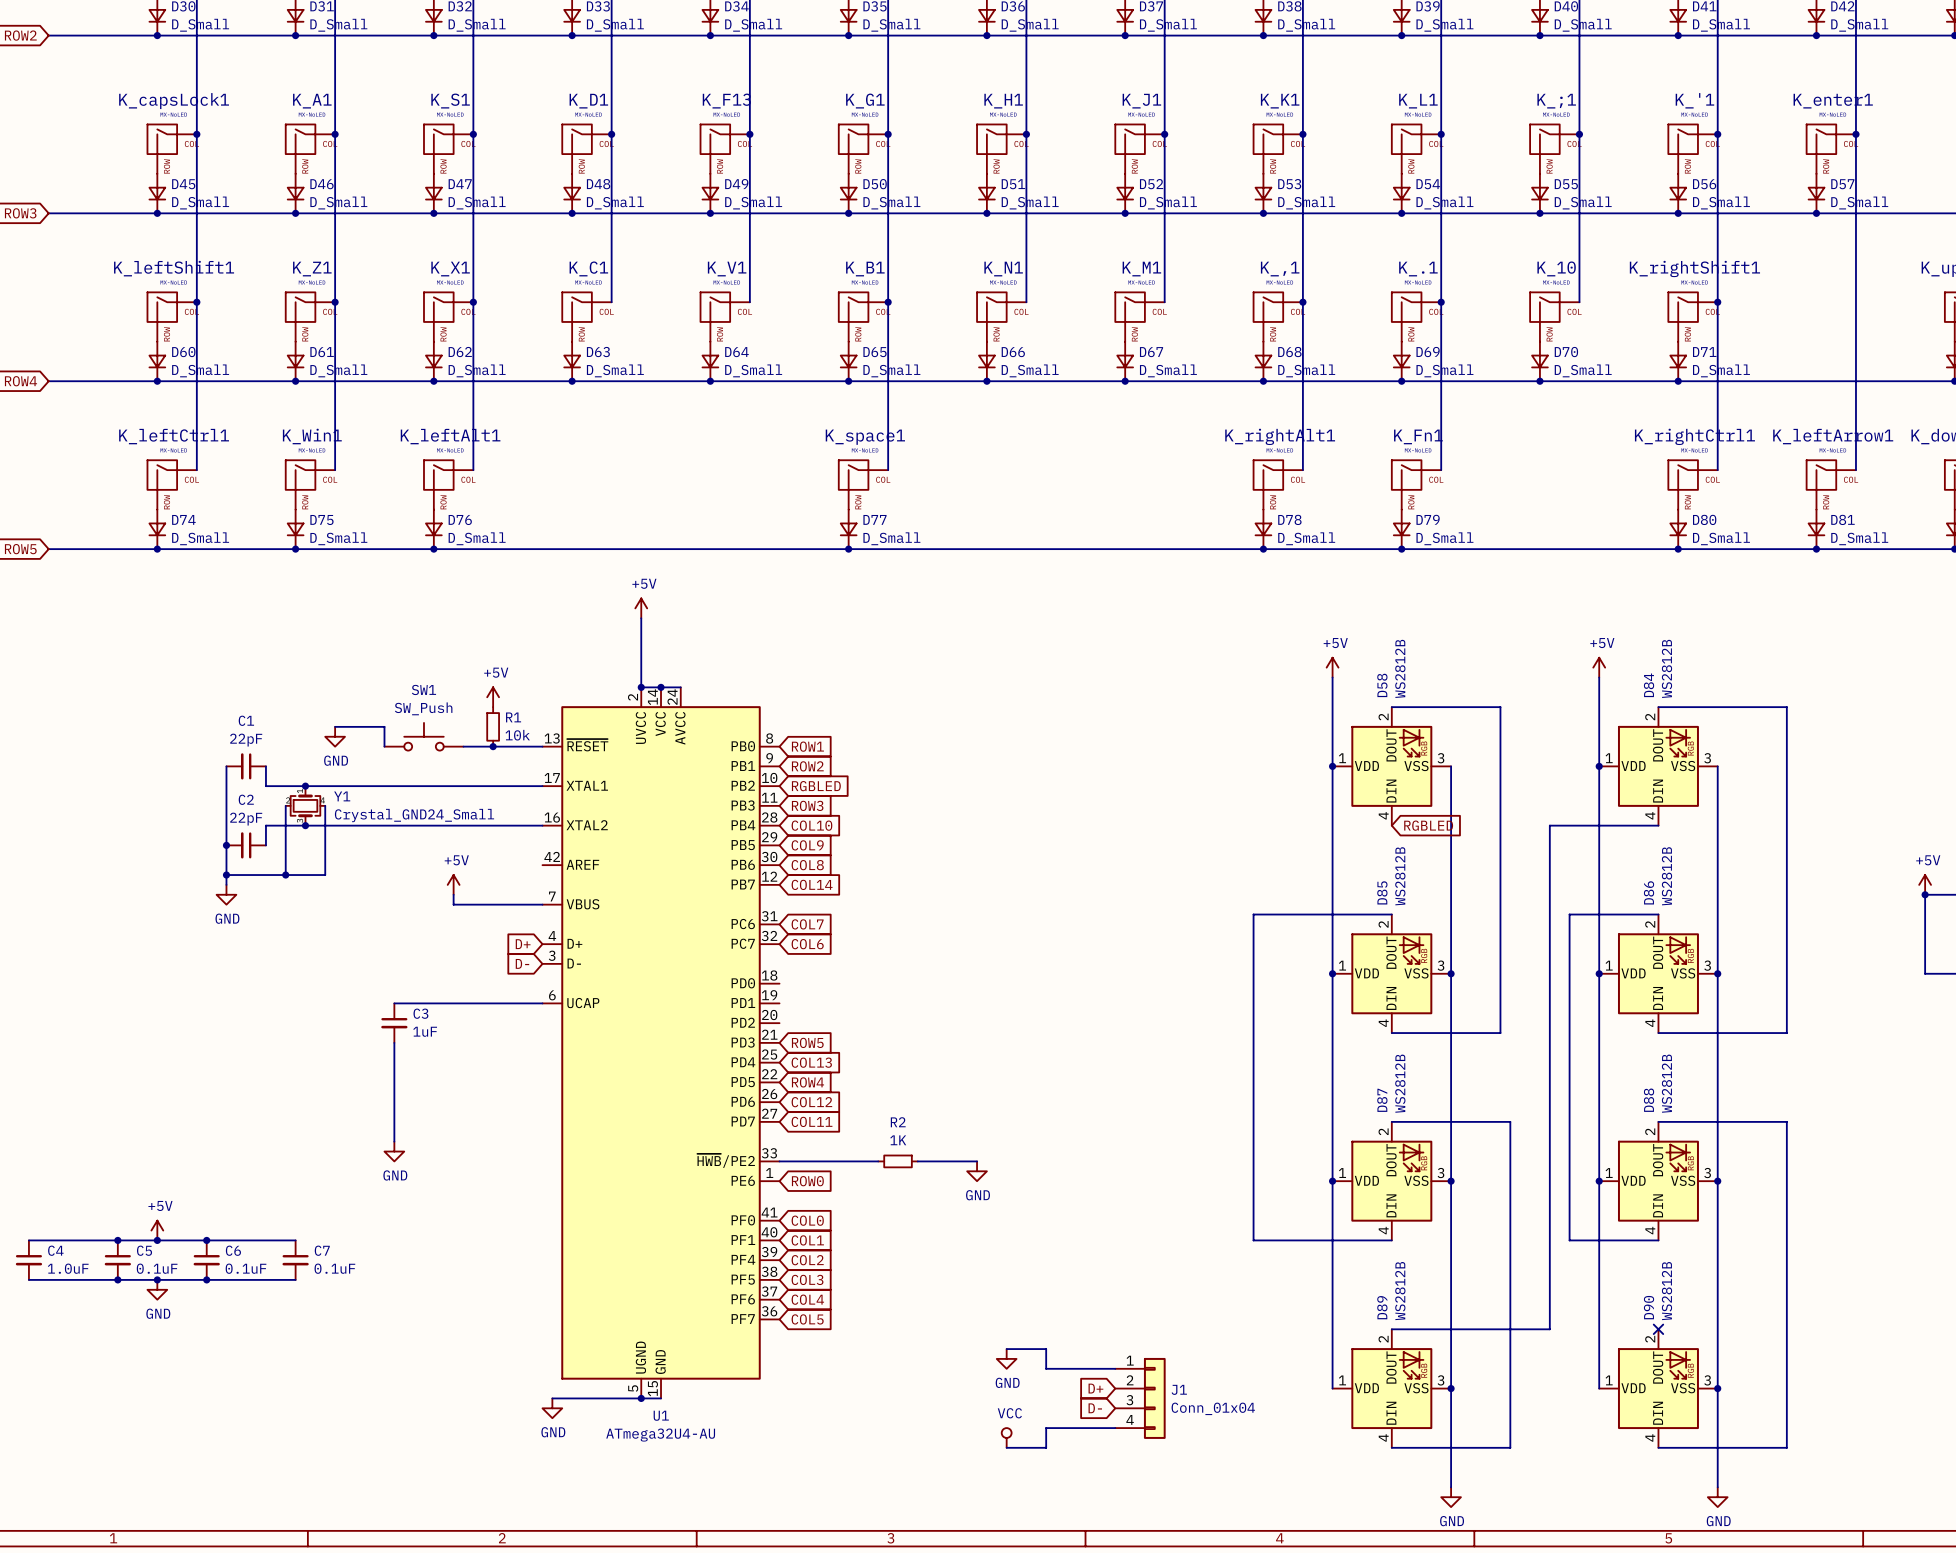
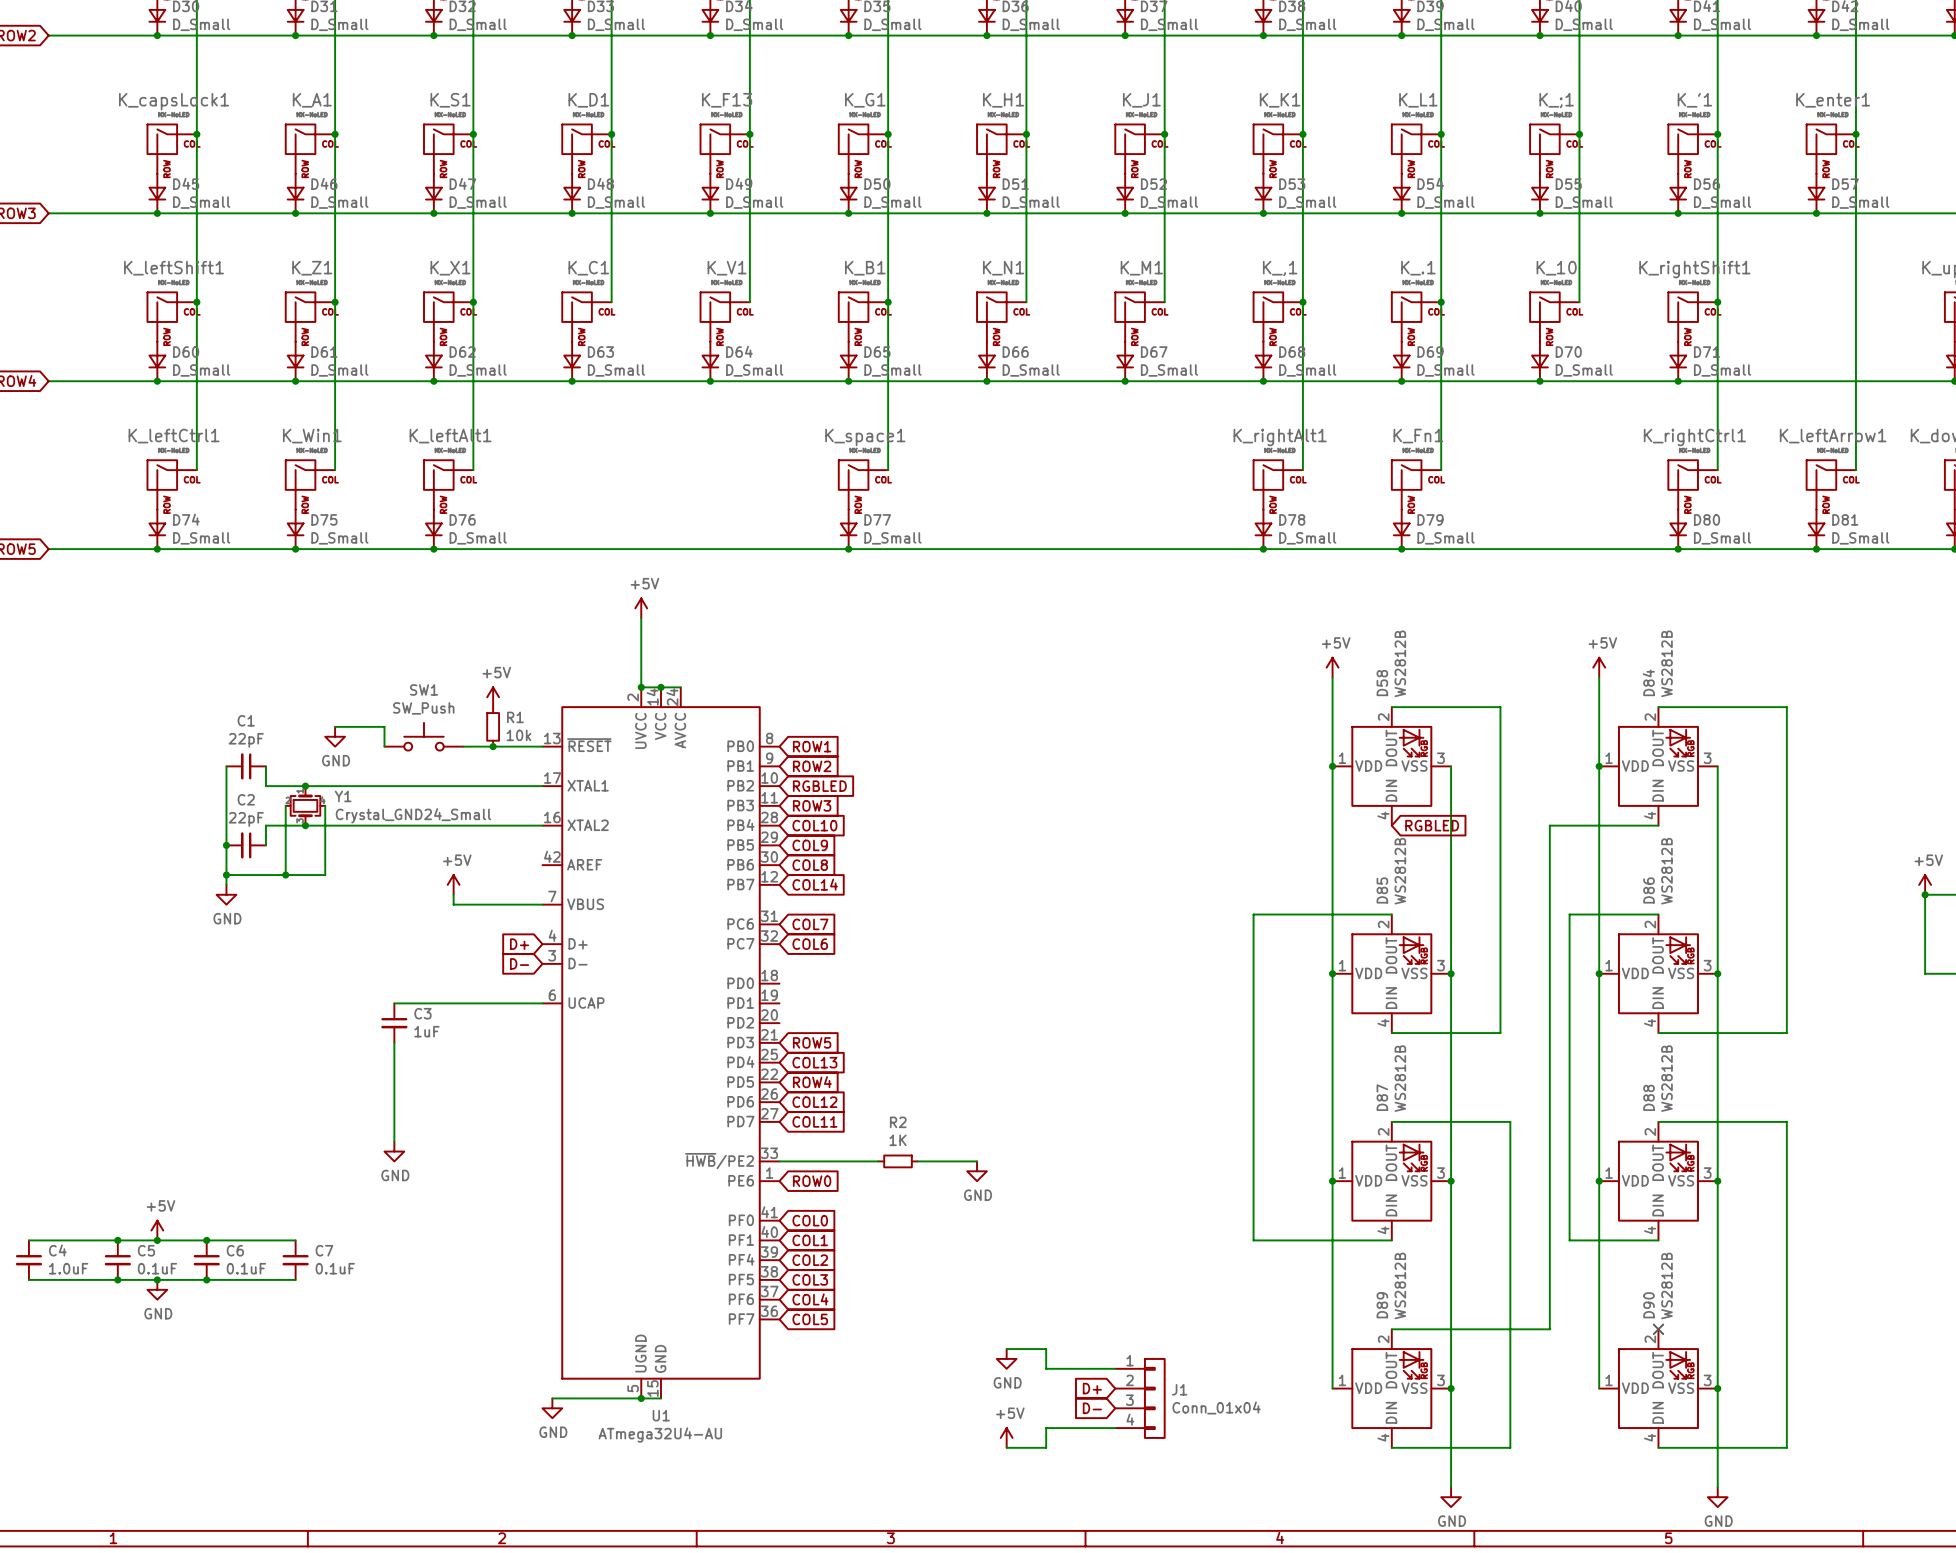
power symbol: VCC (1006, 1437) -> +5V (1006, 1437)

